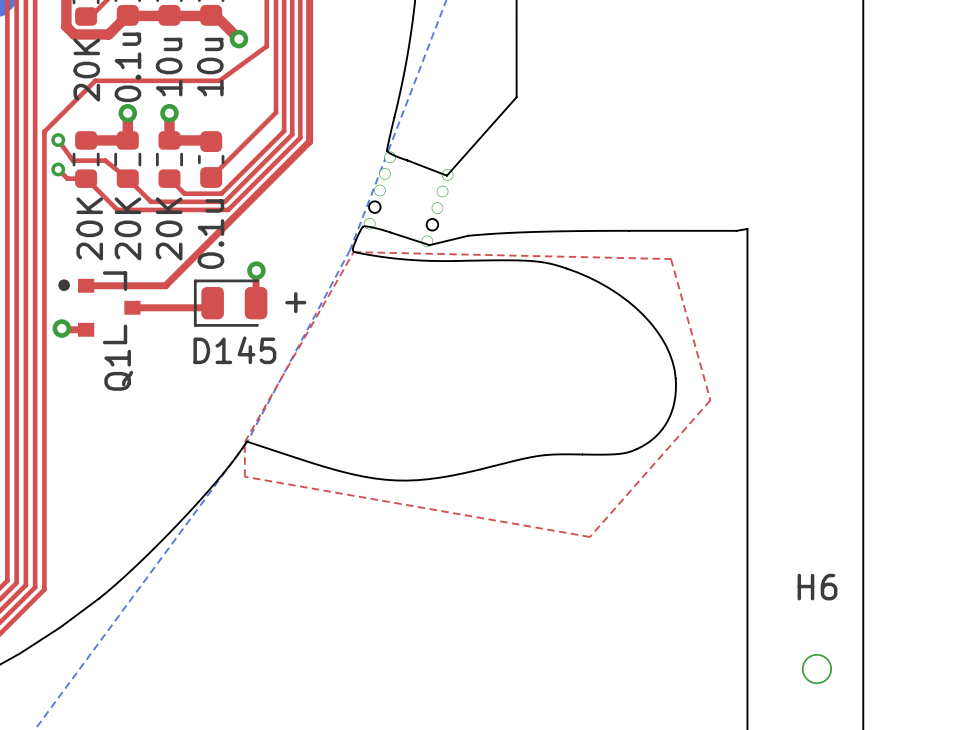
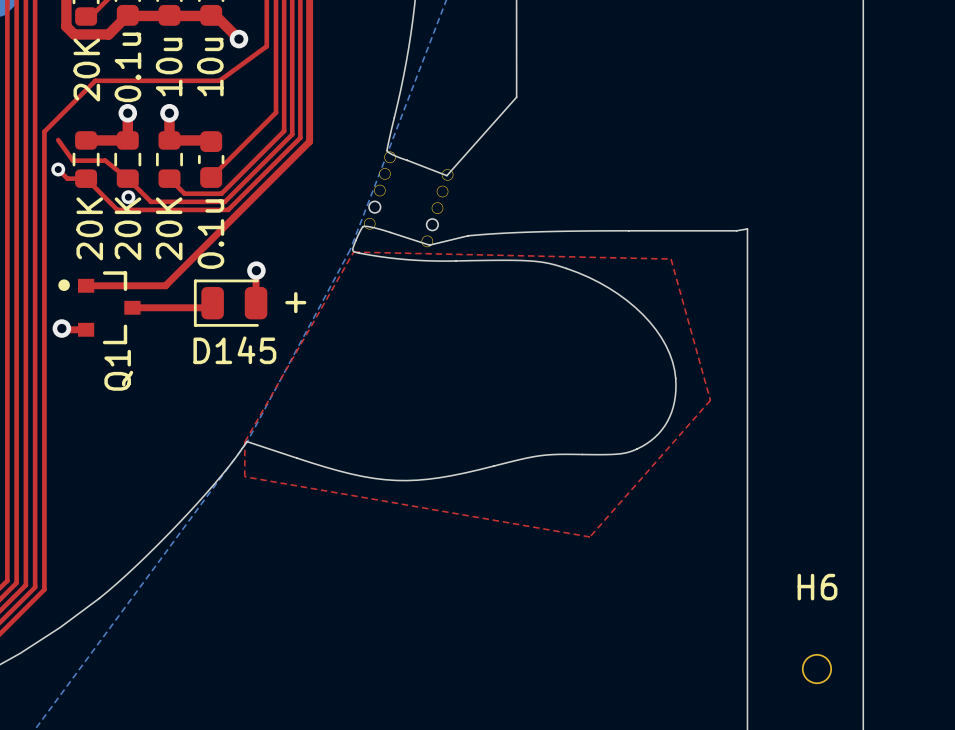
via position: (58, 140) -> (128, 197)

